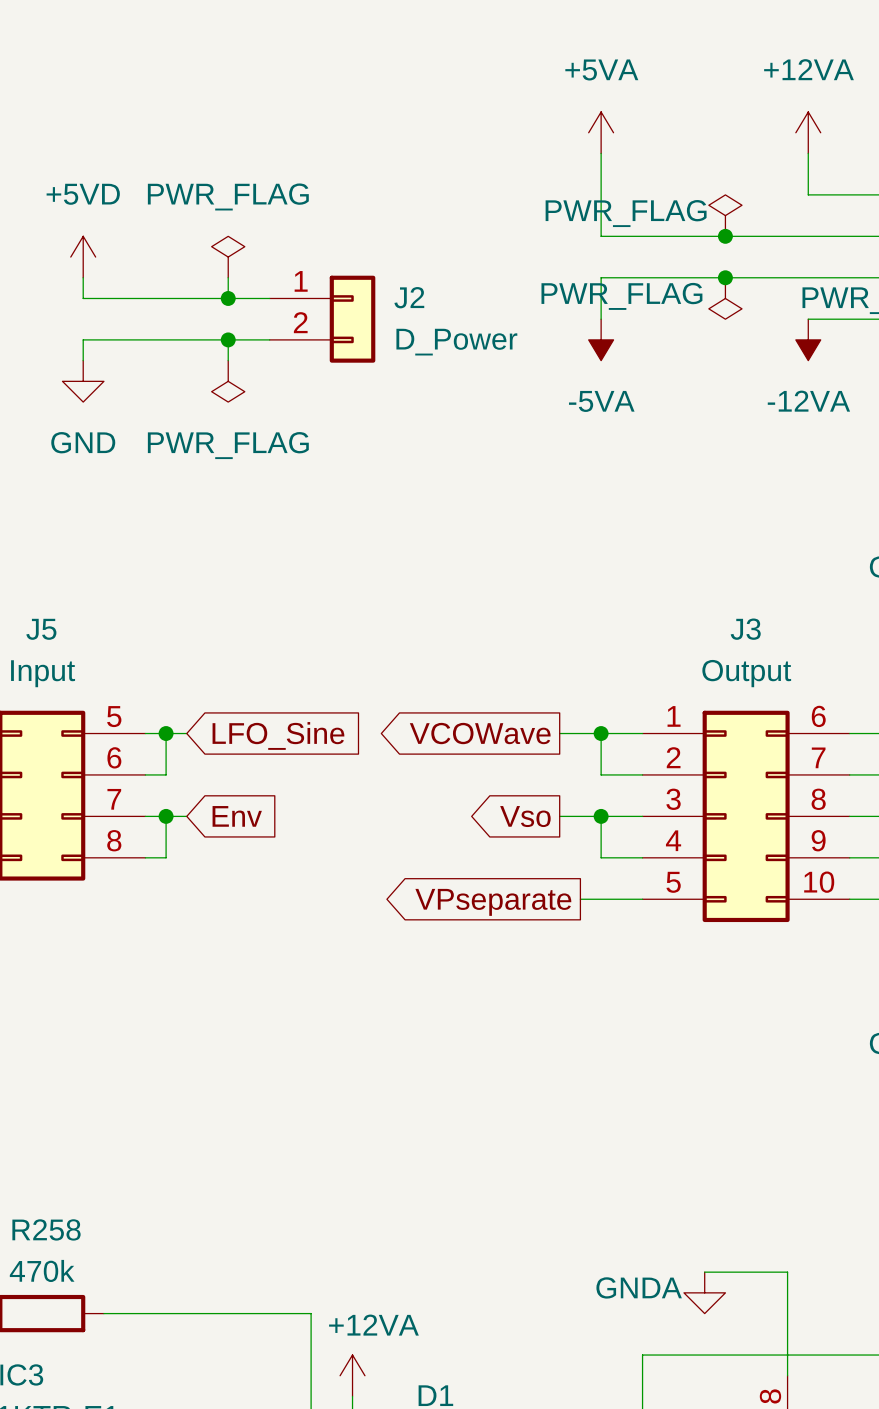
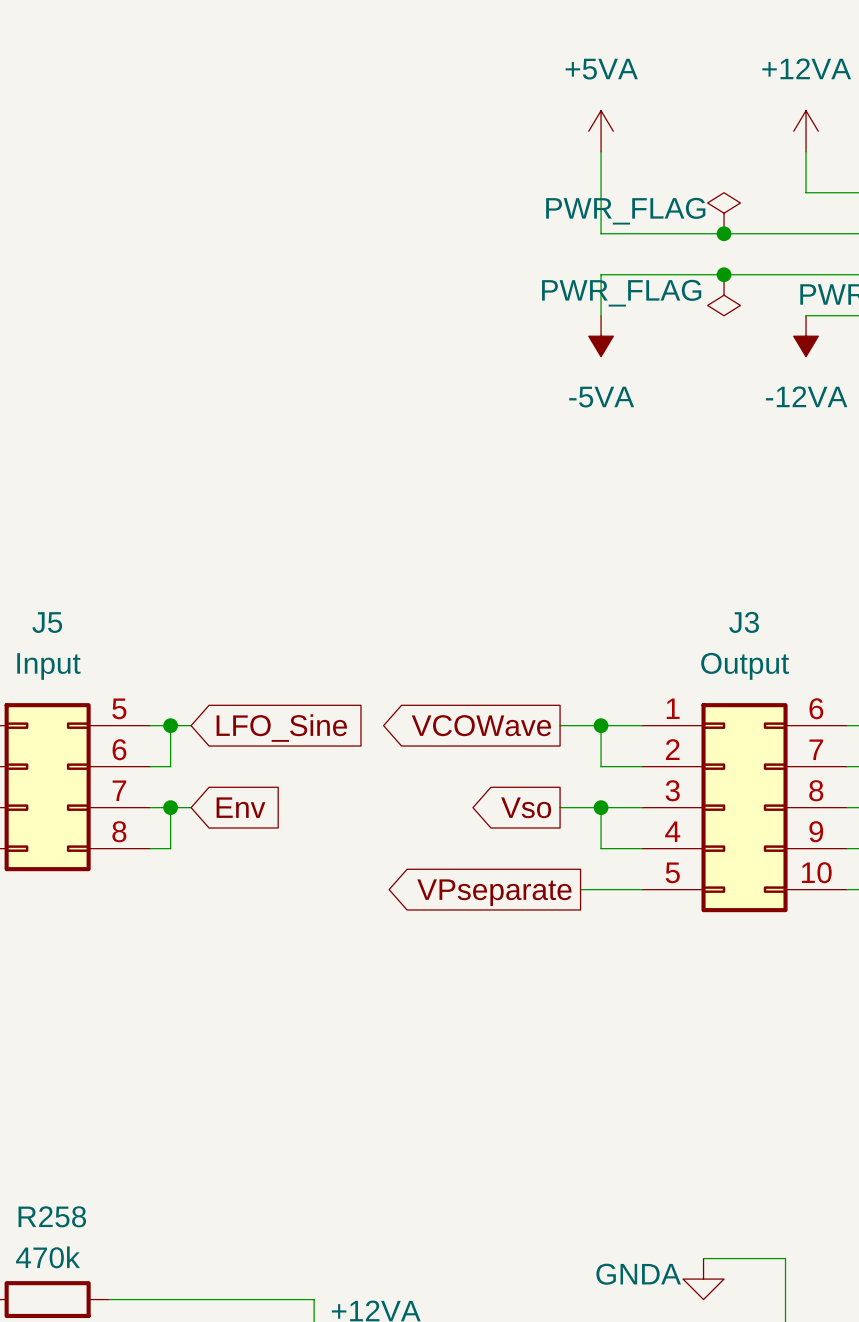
power symbol: +5VD (83, 257) -> none
power symbol: PWR_FLAG (228, 257) -> none
wire: (83, 277) (83, 298) (269, 298) -> none
wire: (228, 277) (228, 298) -> none
junction: (228, 298) -> none
J2: D_Power (322, 319) -> none
wire: (228, 339) (228, 360) -> none
junction: (228, 339) -> none
wire: (269, 339) (83, 339) (83, 360) -> none
power symbol: GND (83, 381) -> none
power symbol: PWR_FLAG (228, 381) -> none

